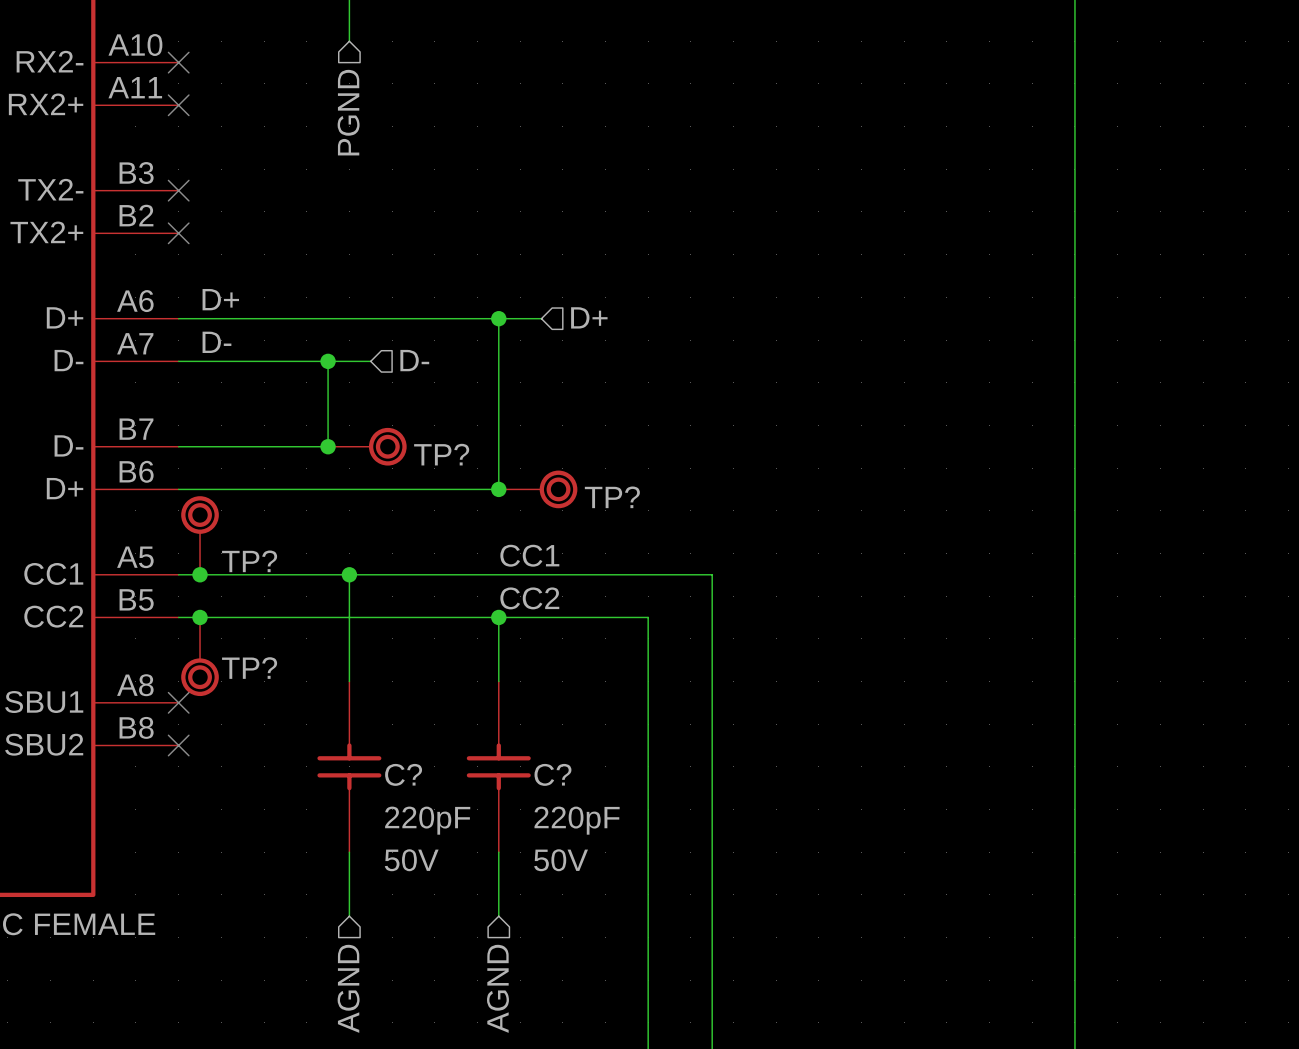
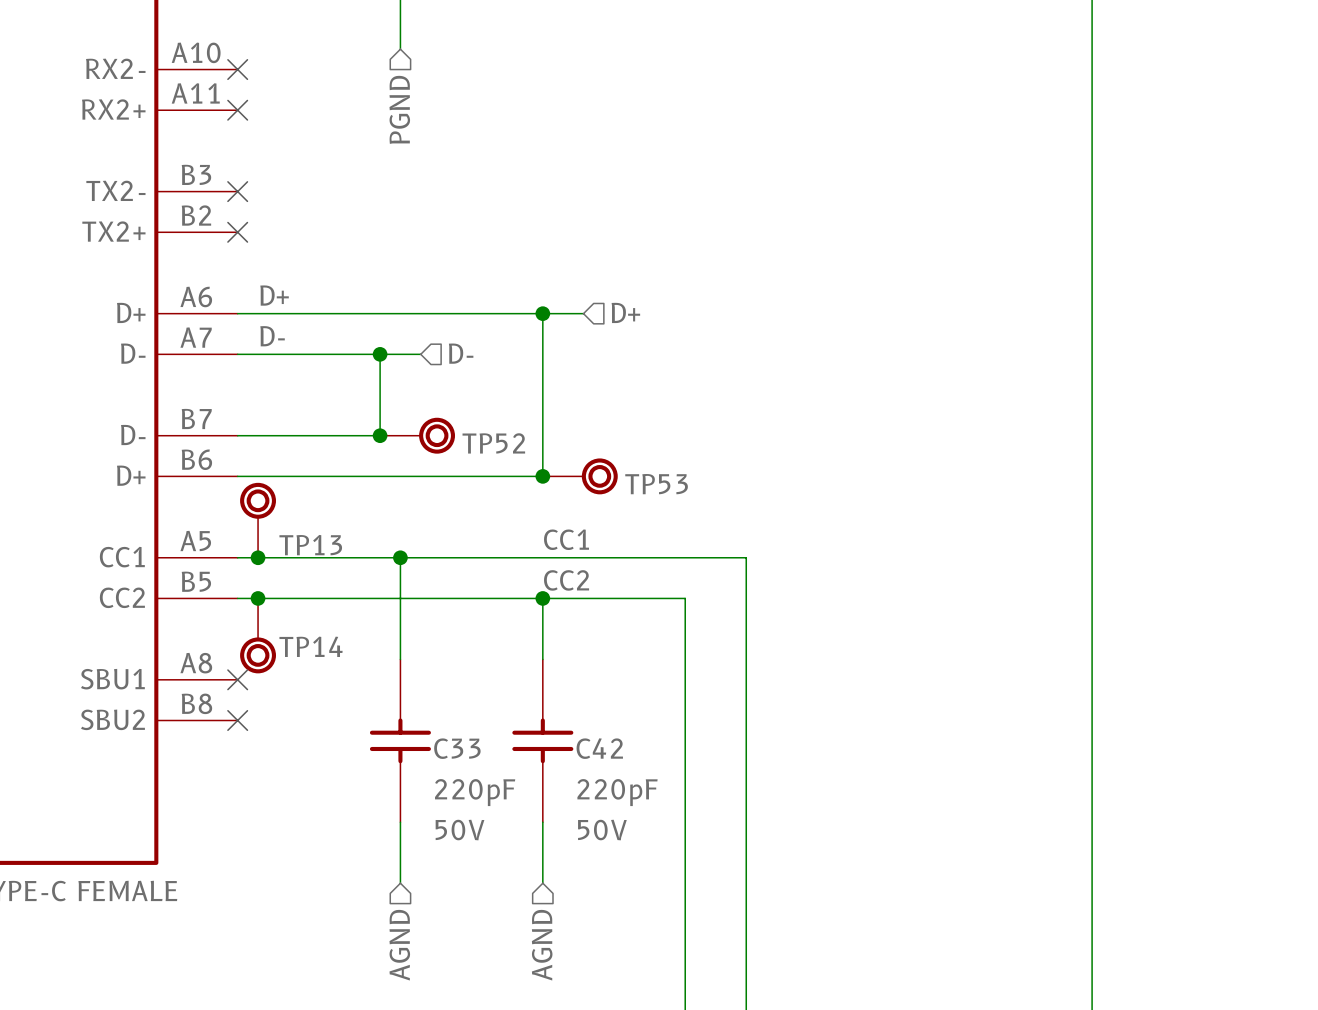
TP? name: TP? (441, 454) -> TP52 (493, 443)
TP? name: TP? (612, 497) -> TP53 (656, 484)
TP? name: TP? (249, 561) -> TP13 (310, 545)
TP? name: TP? (249, 668) -> TP14 (311, 646)
C? name: C? (403, 774) -> C33 (457, 748)
C? name: C? (552, 774) -> C42 (599, 748)

